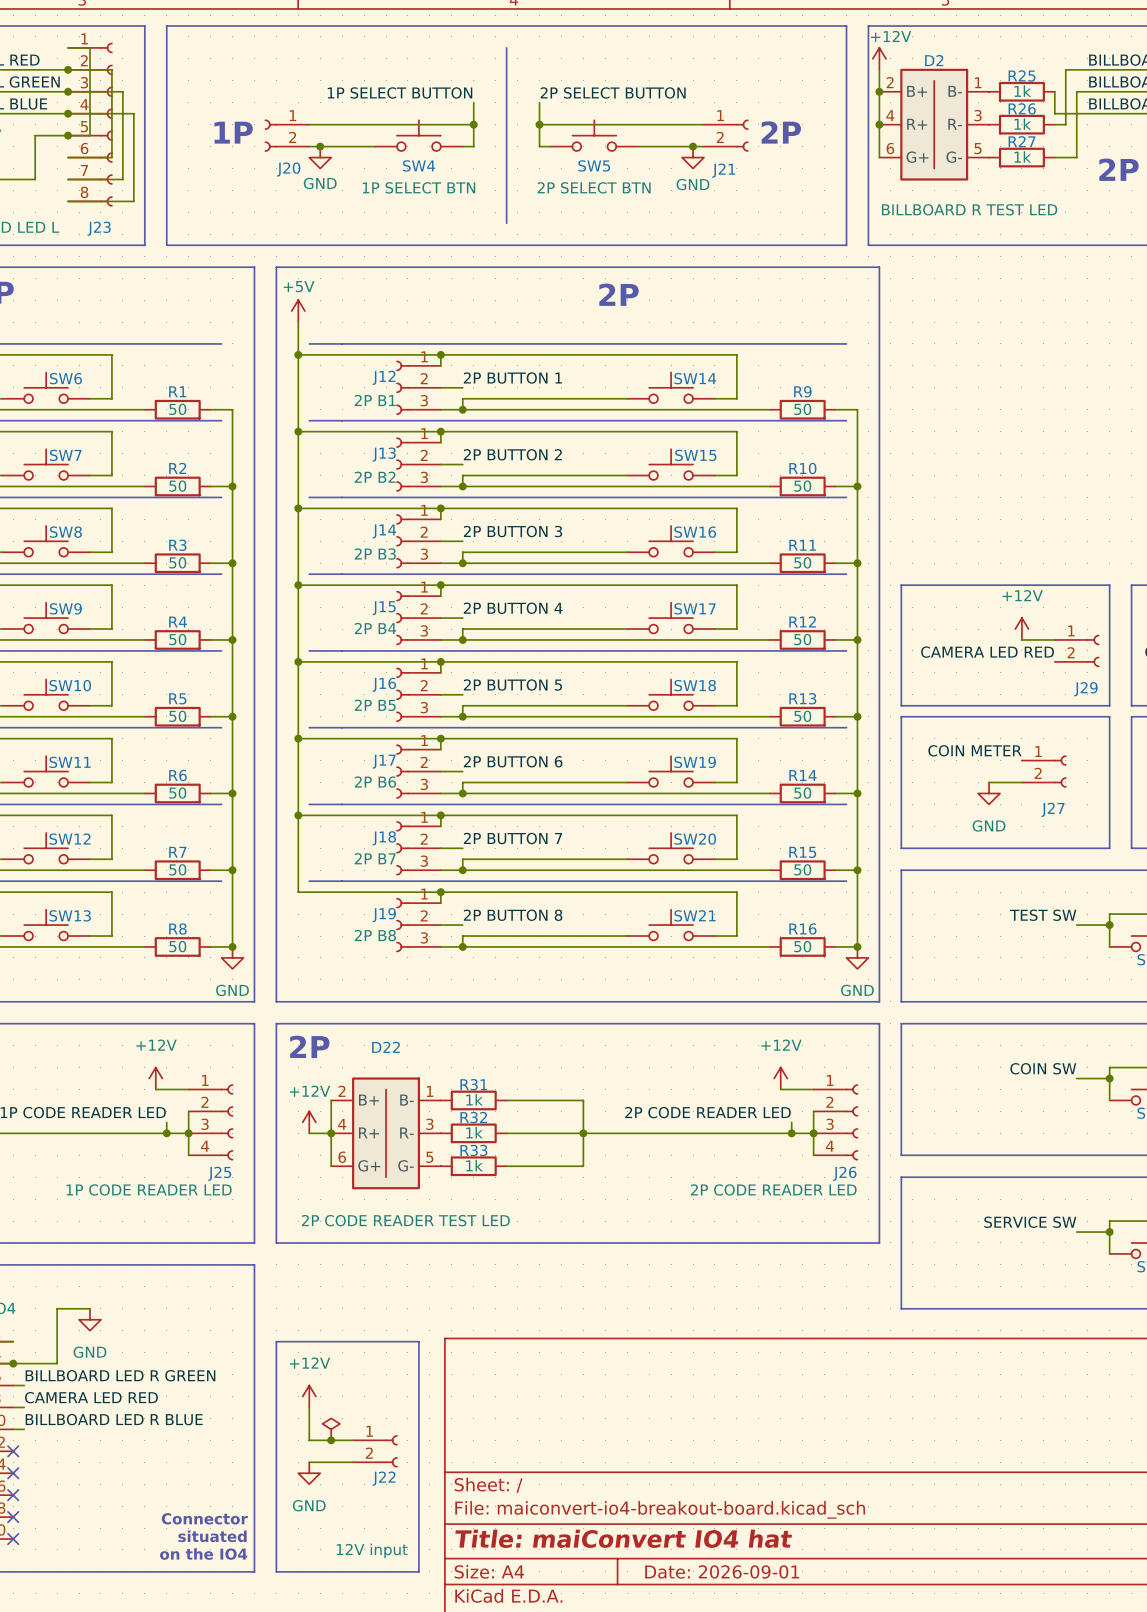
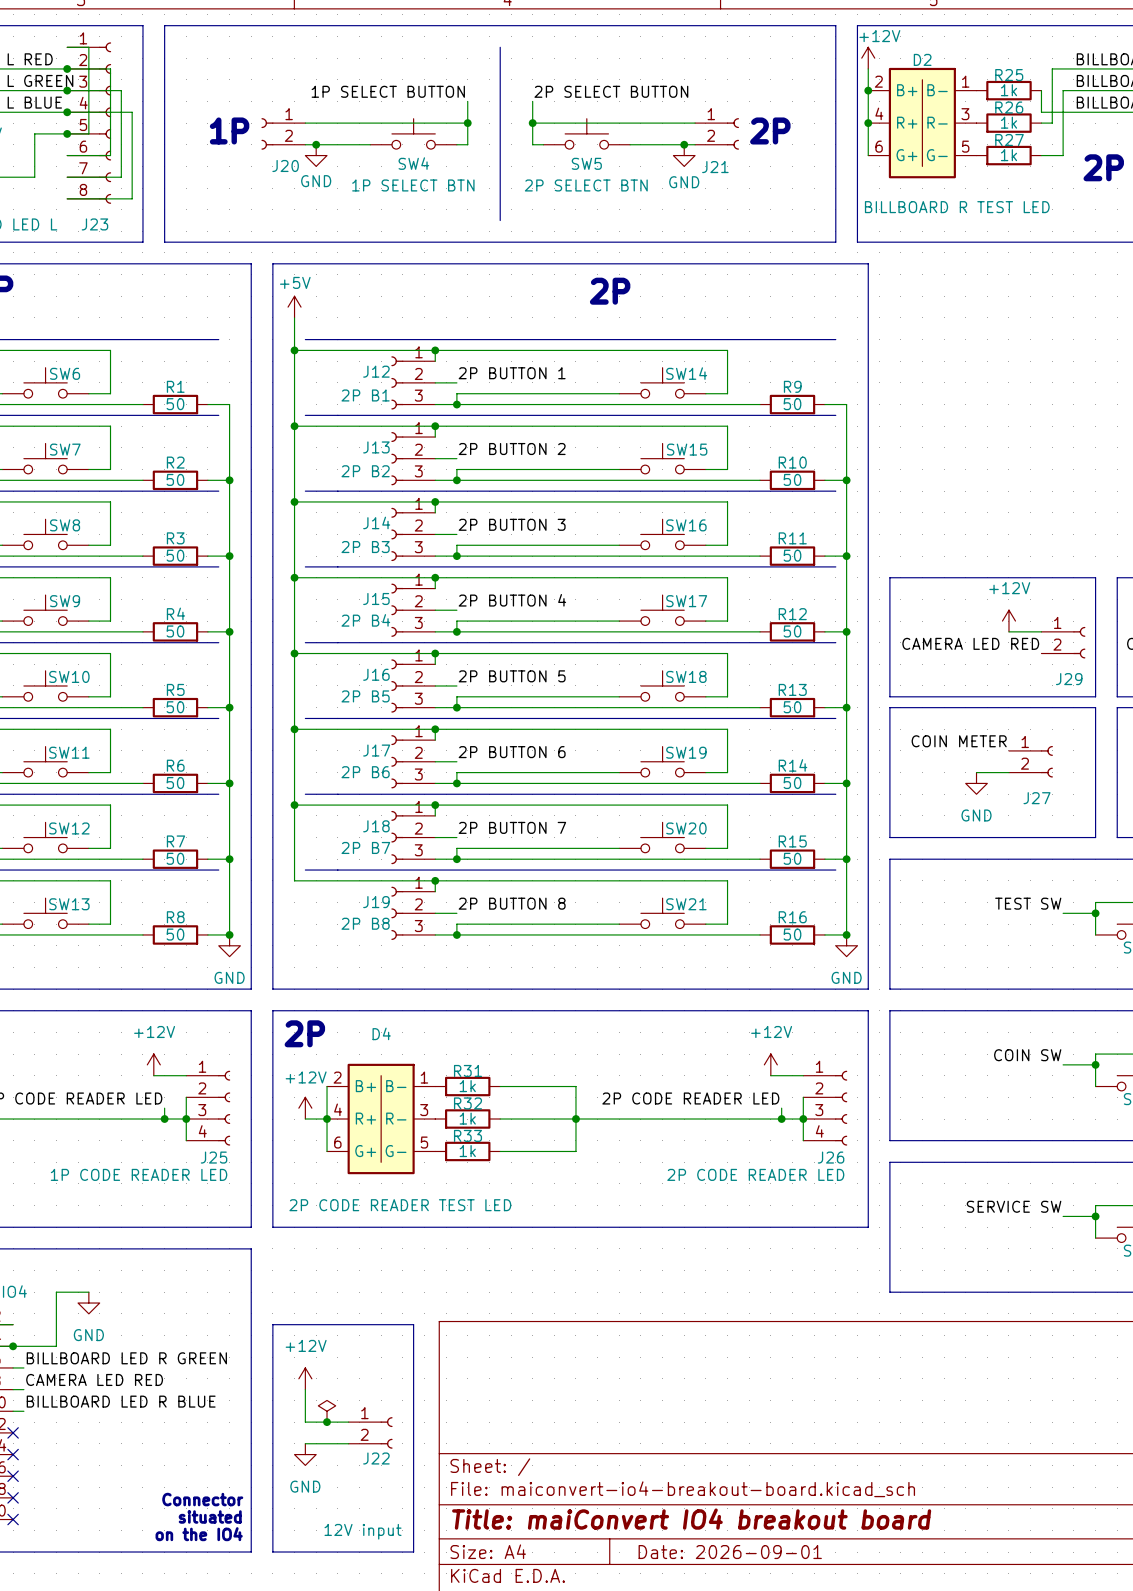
D22 name: D22 (386, 1047) -> D4 (381, 1033)
title block: Title: maiConvert IO4 hat (623, 1538) -> Title: maiConvert IO4 breakout board (691, 1519)

